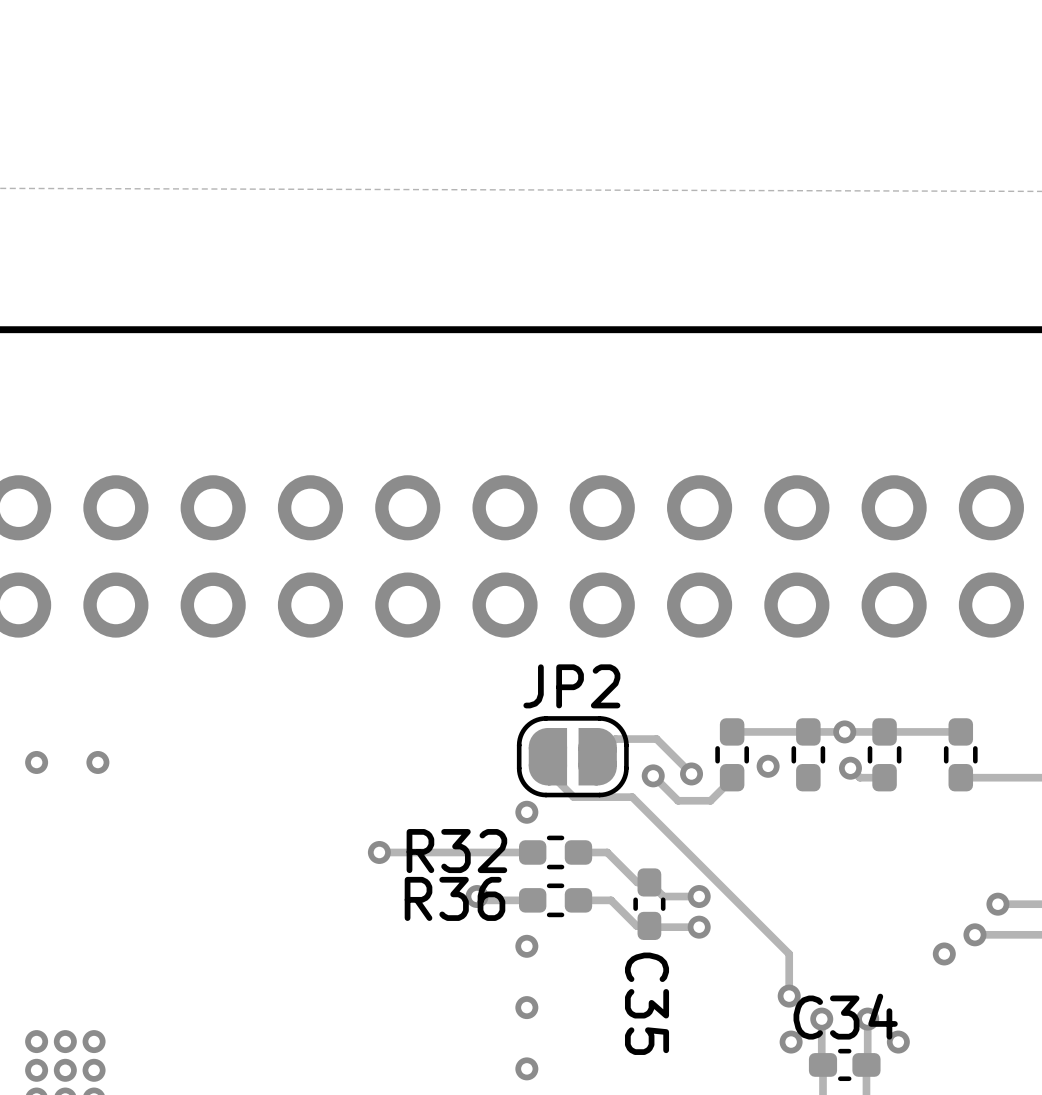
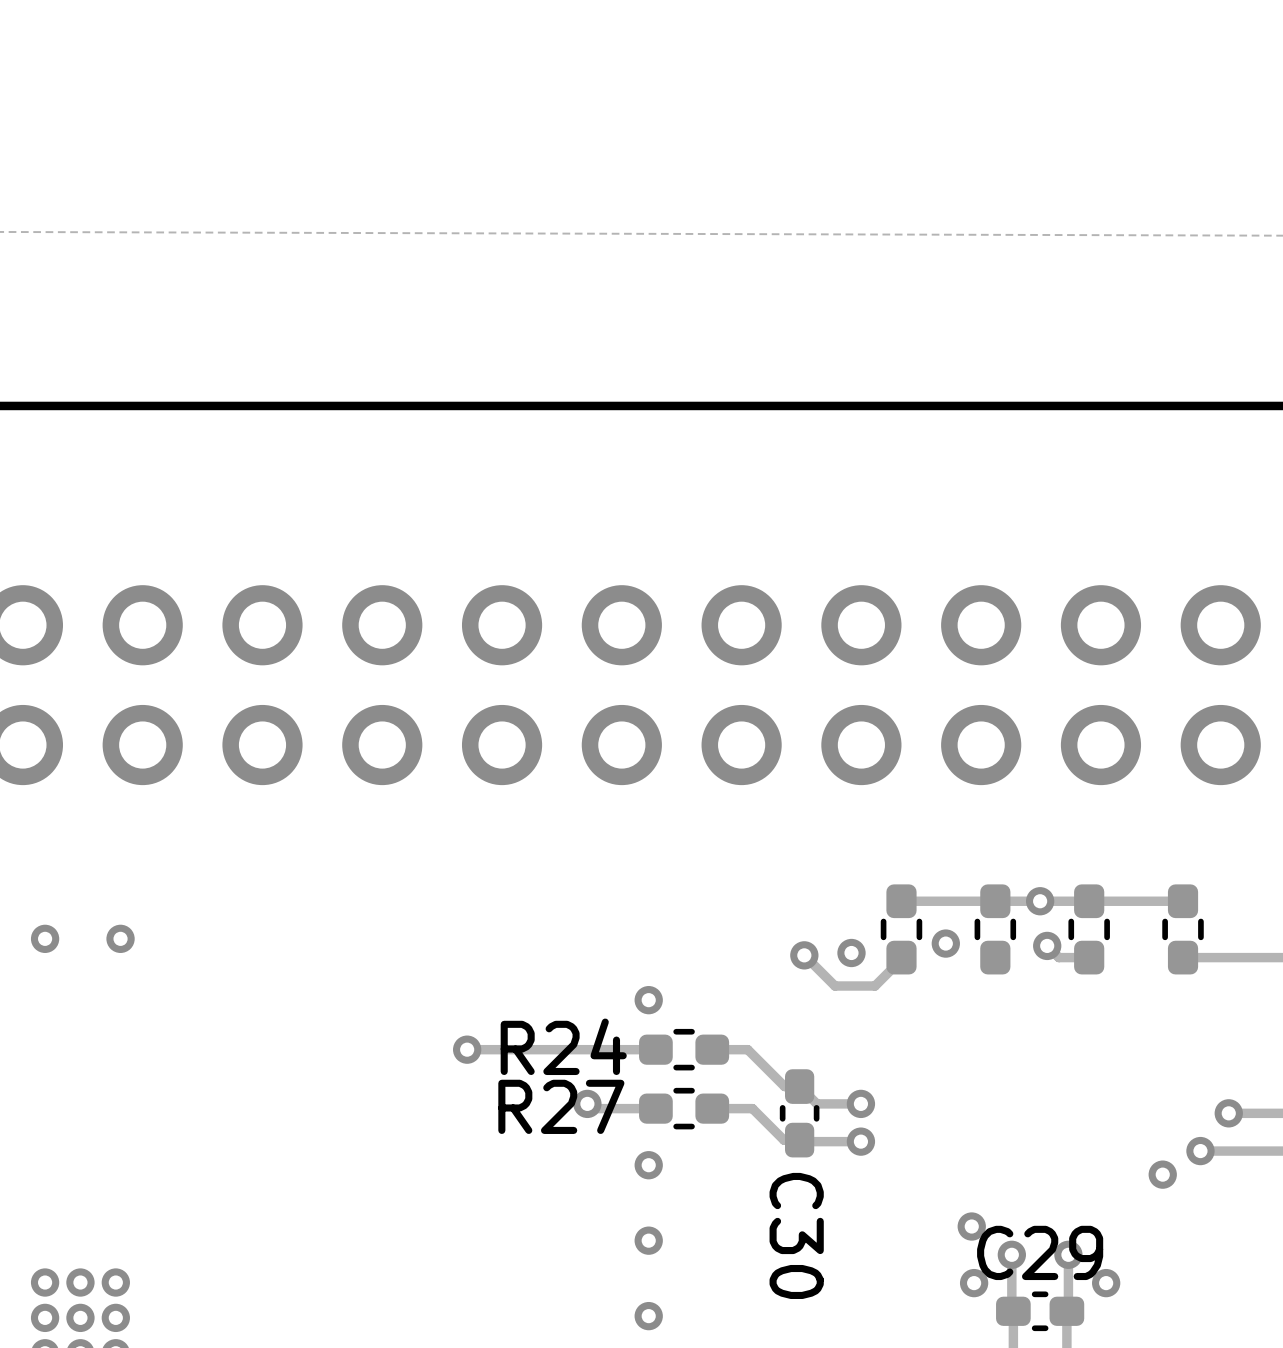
track: (547, 756) (547, 771) (573, 797) (632, 797) (789, 954) (789, 996) -> none
JP2: (572, 756) -> none
track: (597, 756) (615, 739) (656, 739) (691, 773) -> none
R32 name: R32 (456, 851) -> R24 (563, 1046)
R36 name: R36 (454, 898) -> R27 (561, 1106)
C35 name: C35 (647, 1003) -> C30 (796, 1235)
C34 name: C34 (845, 1016) -> C29 (1040, 1252)

